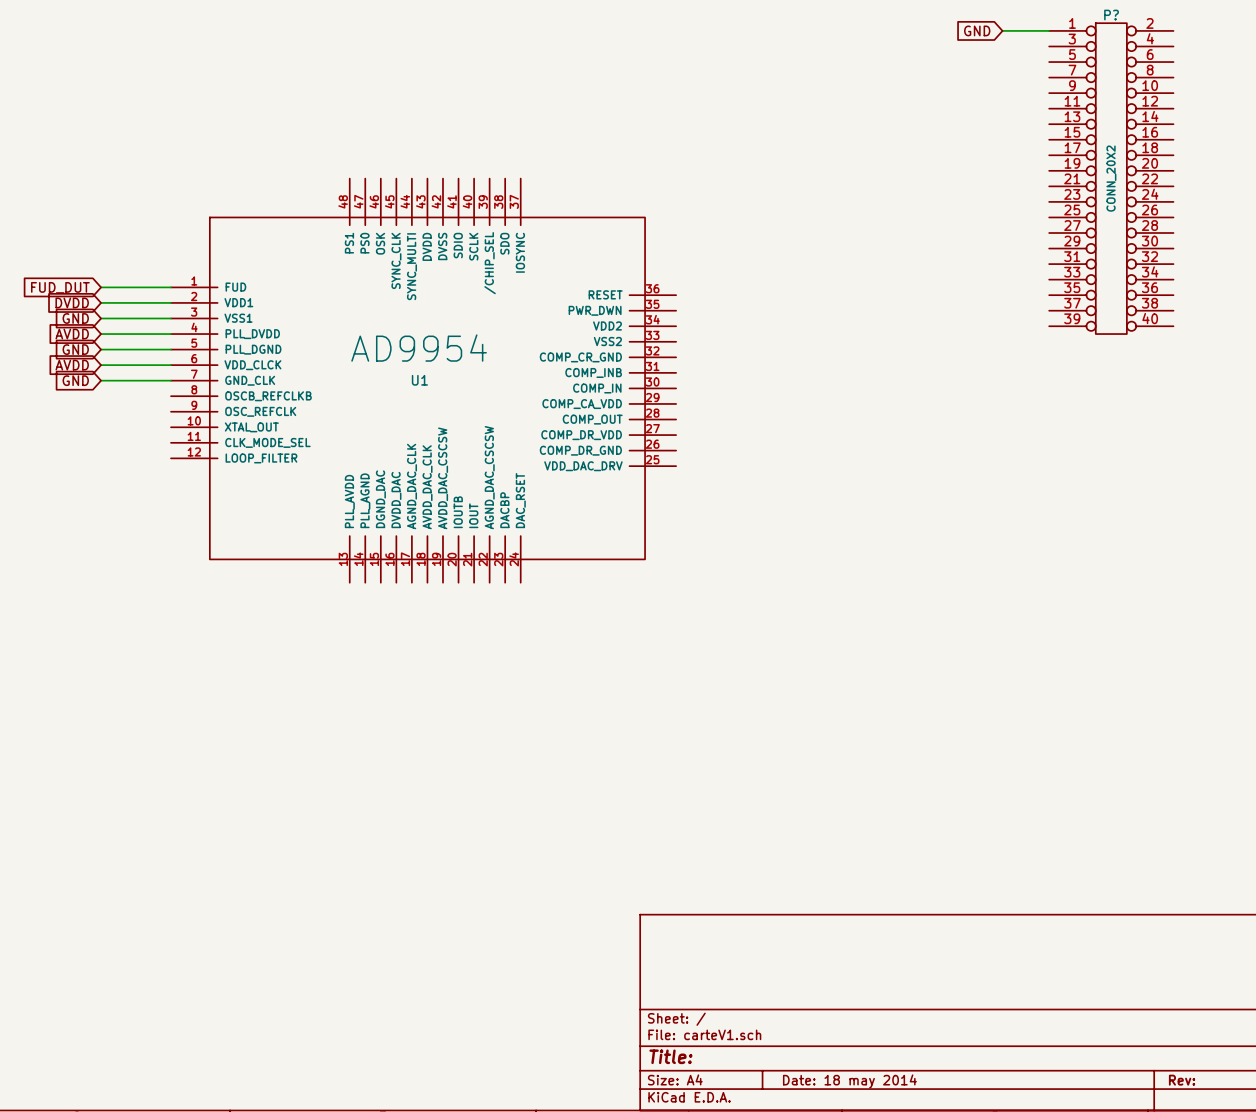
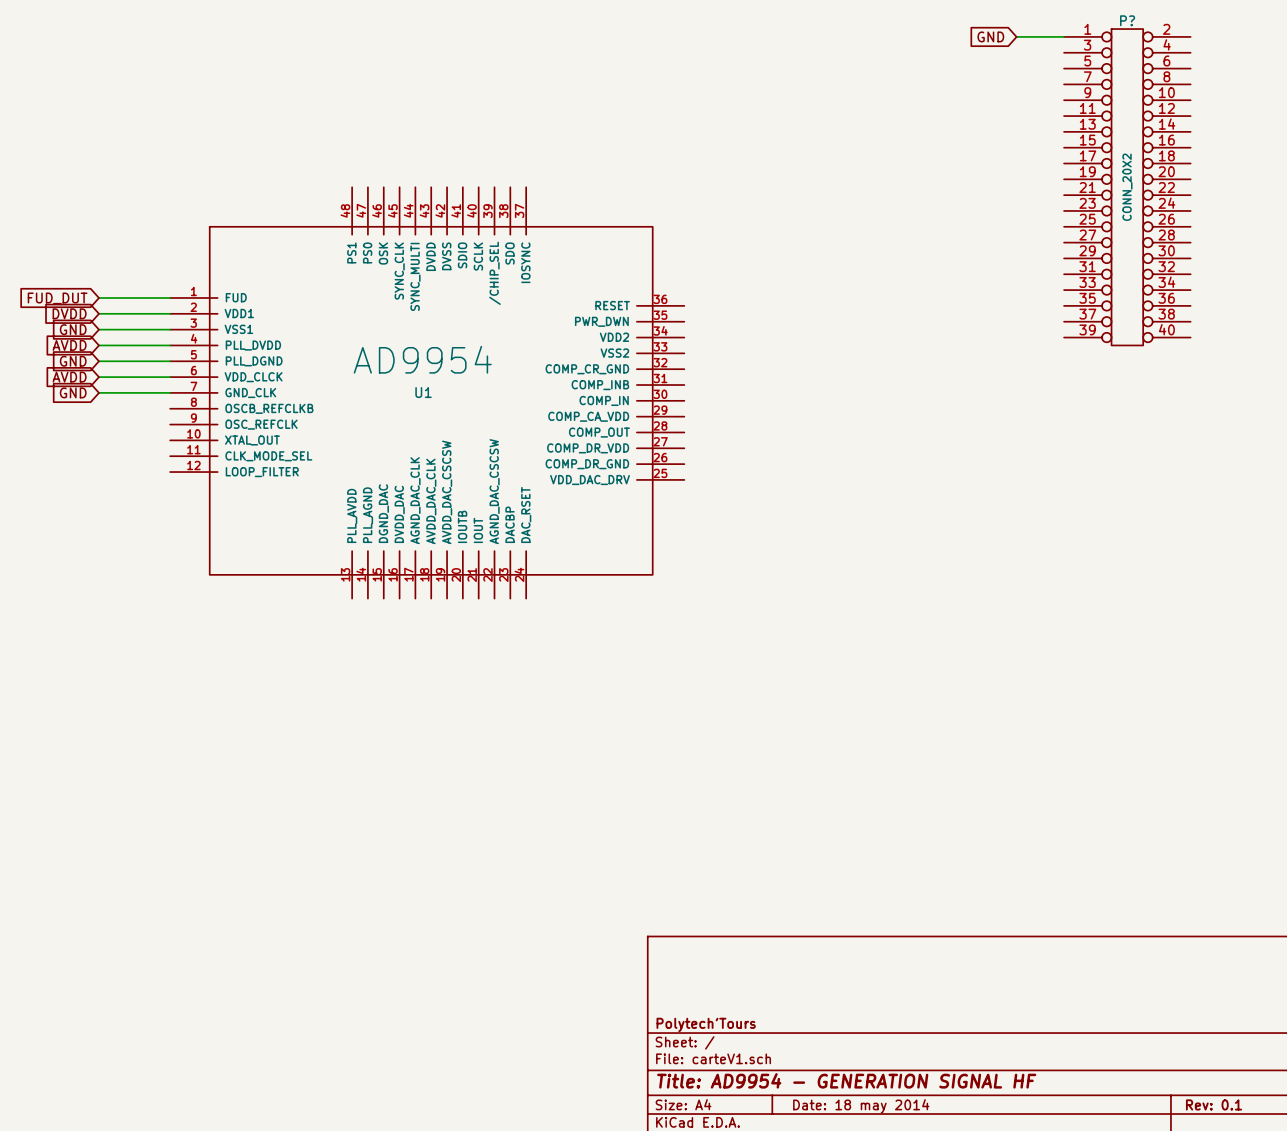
title block: none -> Polytech'Tours (706, 1024)
title block: Title: (670, 1056) -> Title: AD9954 - GENERATION SIGNAL HF (846, 1080)
title block: Rev: (1182, 1080) -> Rev: 0.1 (1214, 1104)

